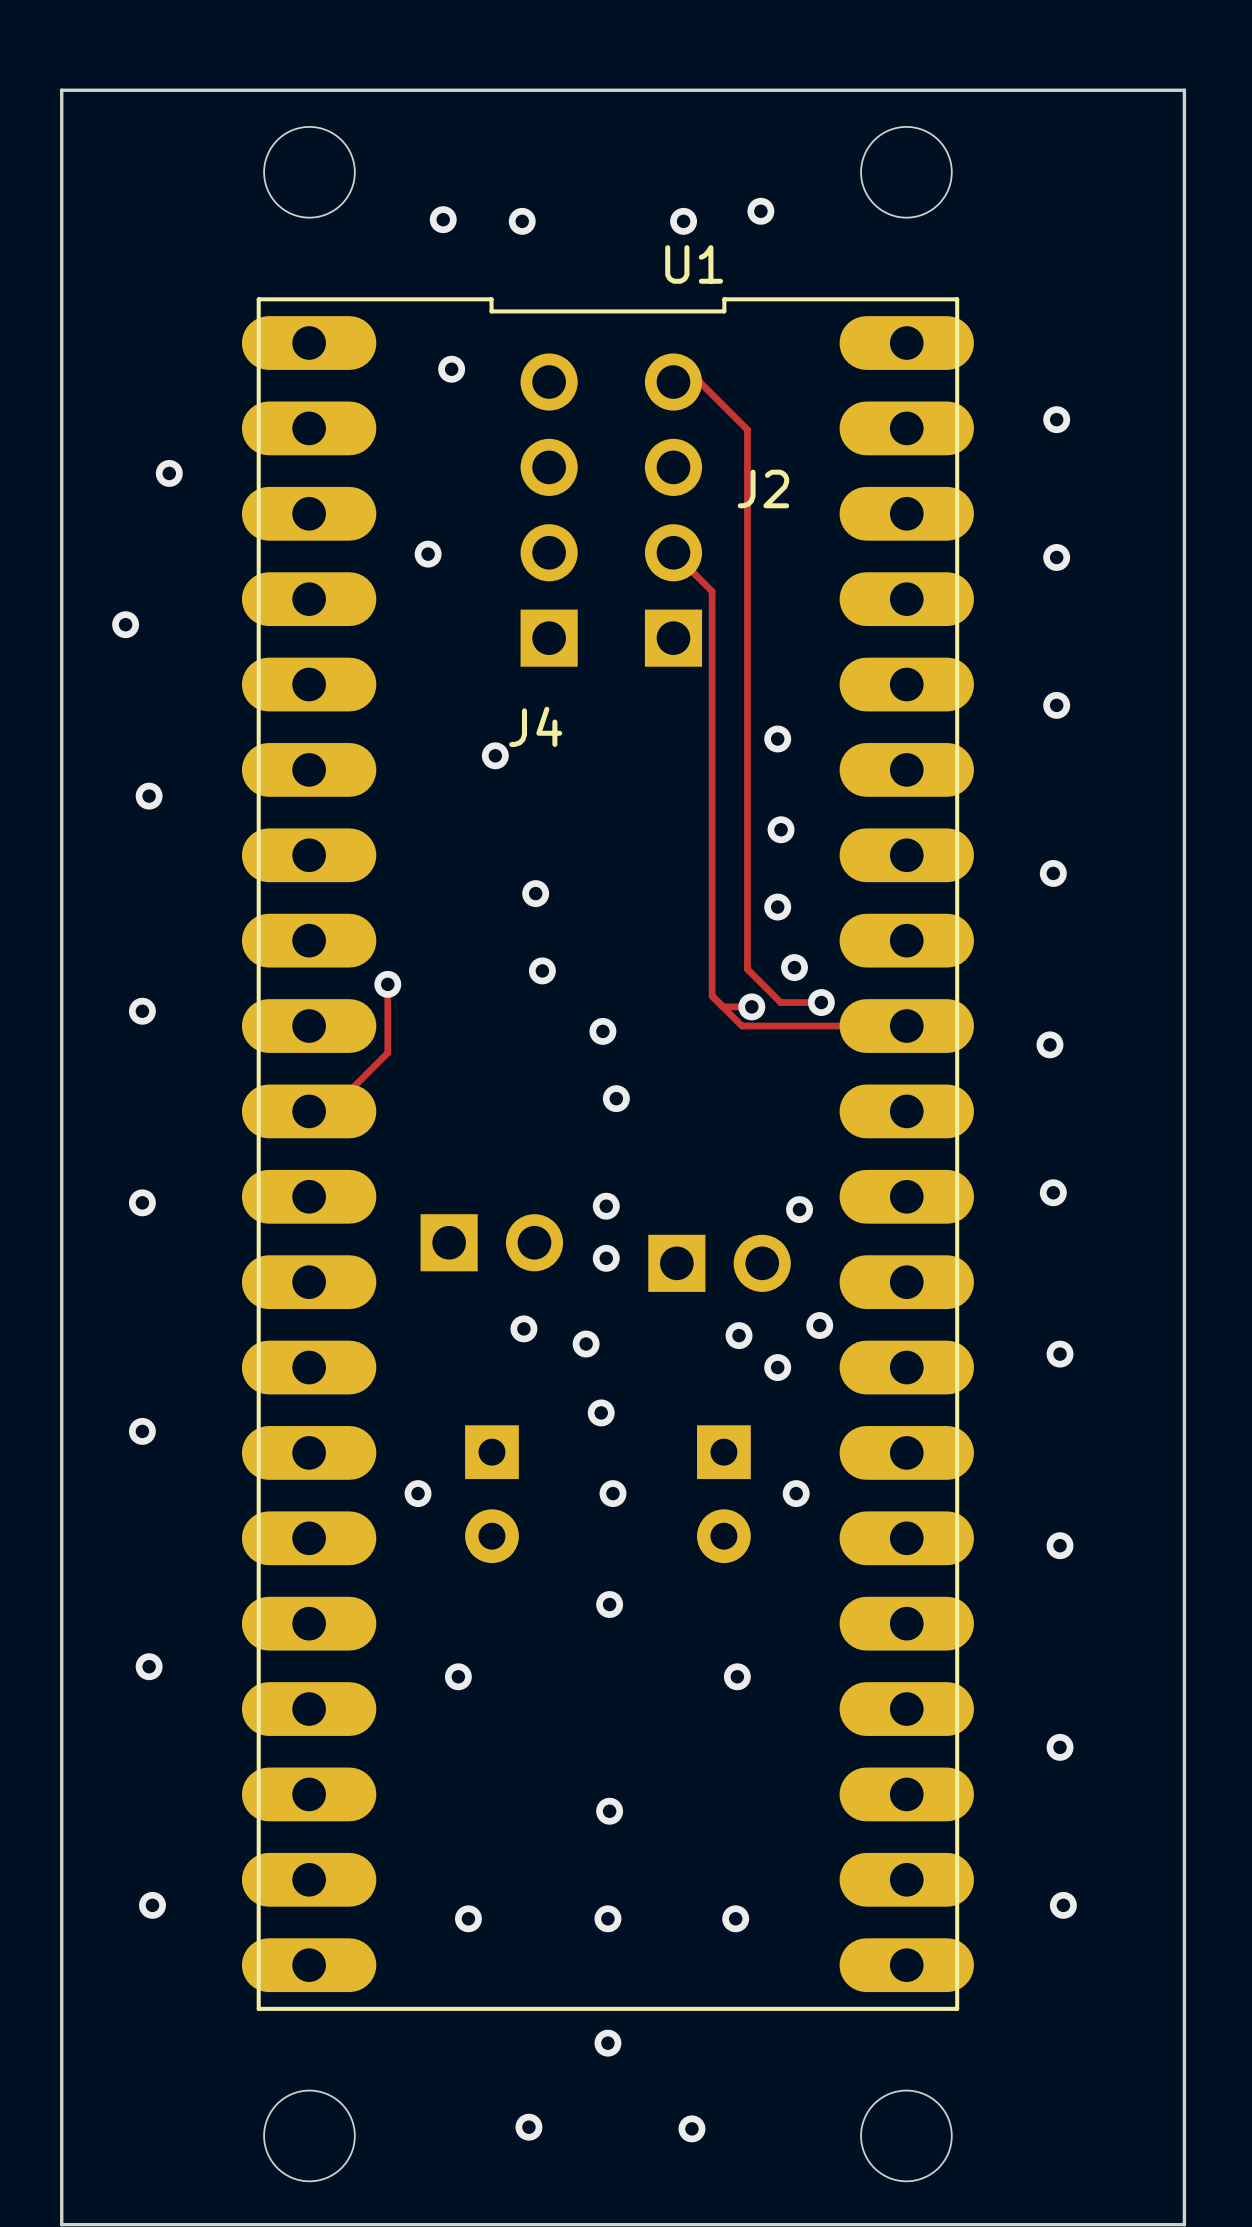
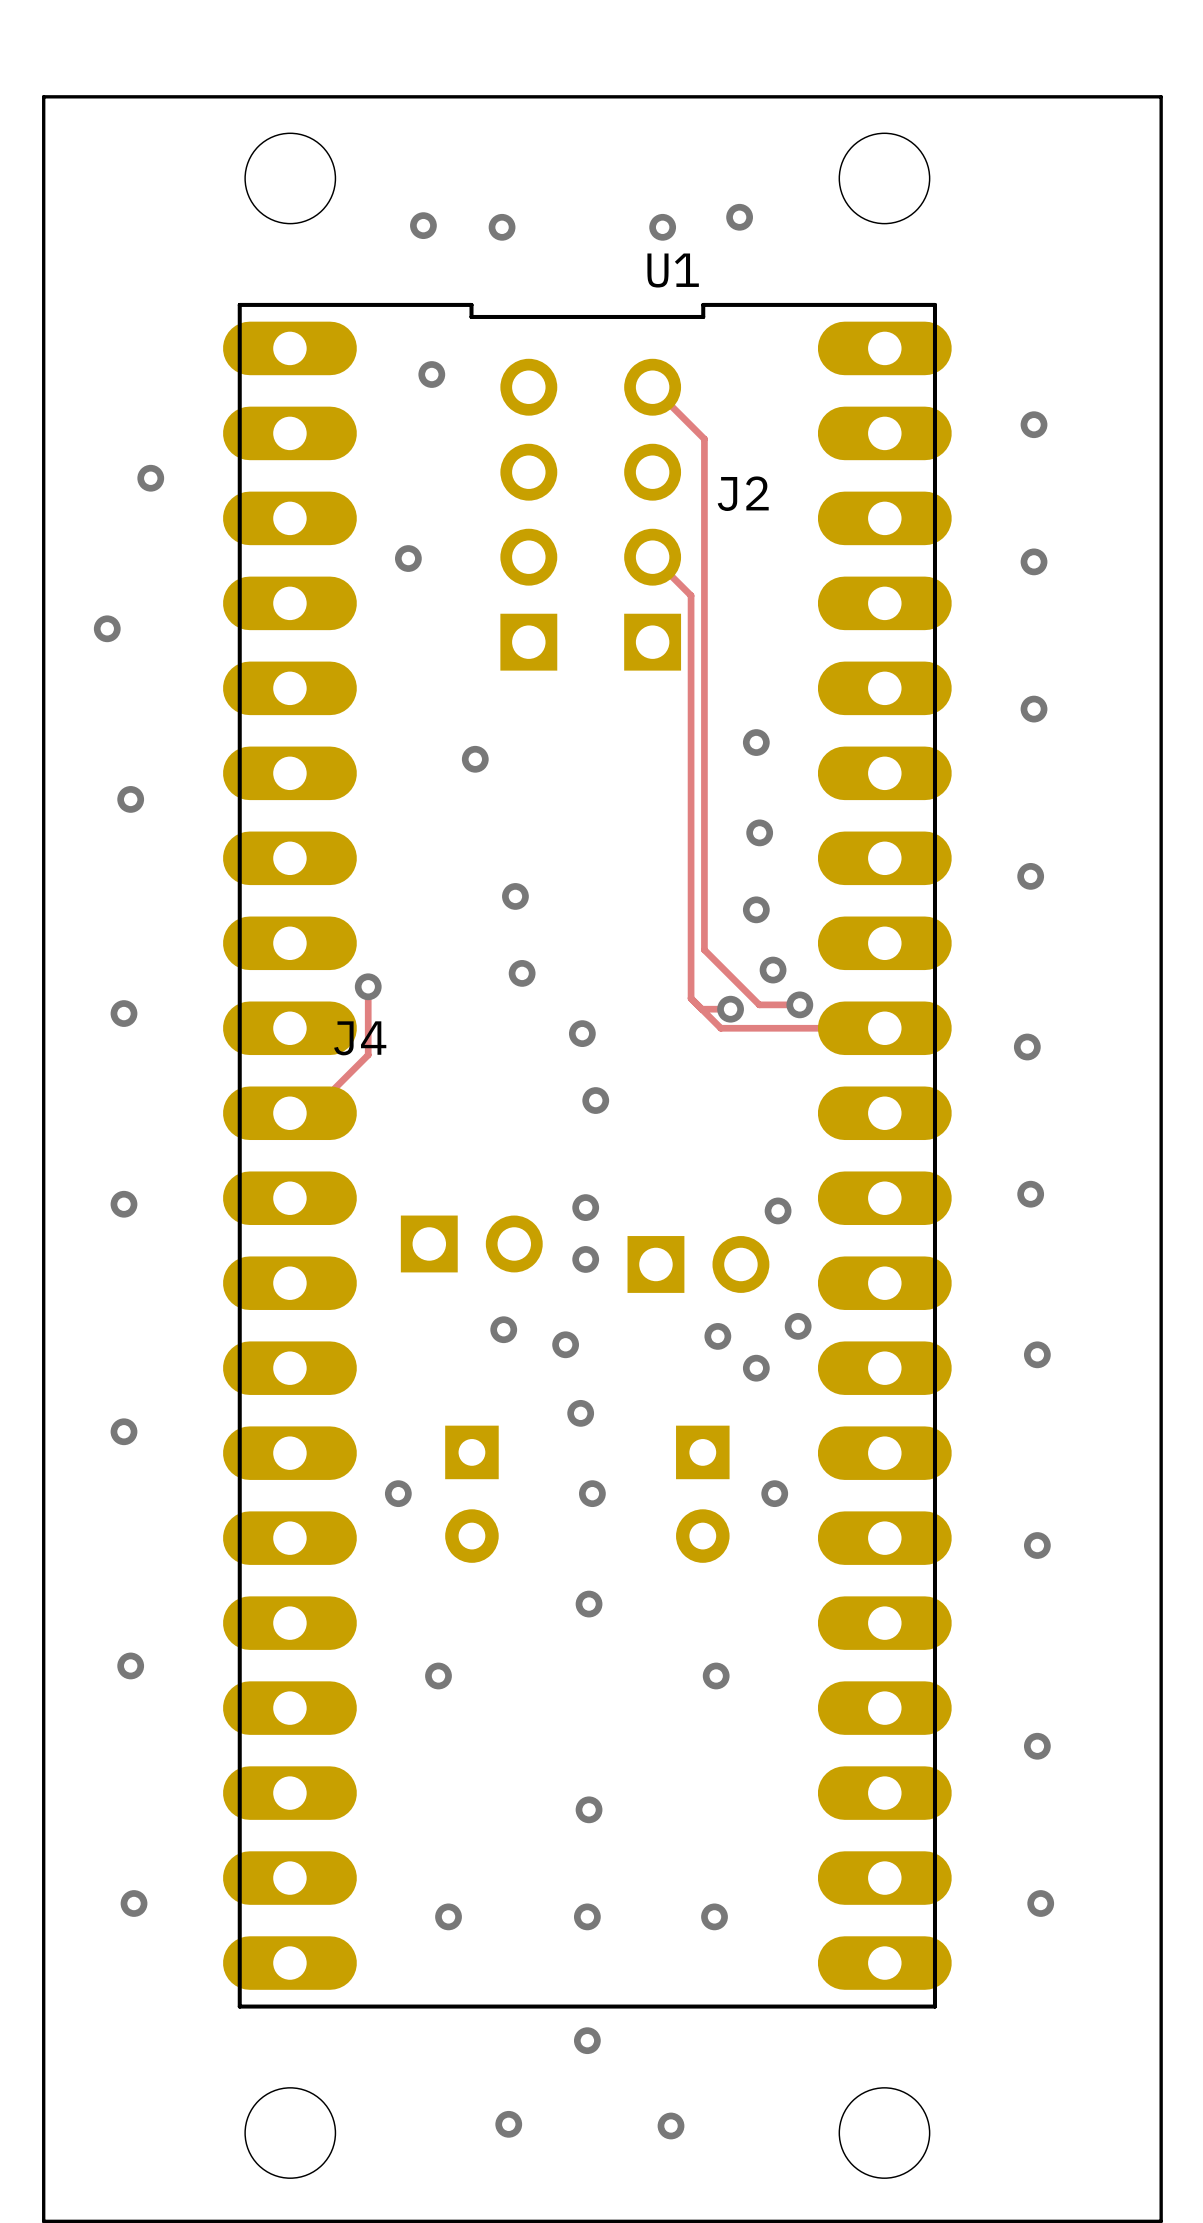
track: (673, 382) (699, 382) (747, 429) (747, 969) -> (652, 387) (704, 439) (704, 949) (726, 971)
J4 name position: J4 (535, 726) -> J4 (360, 1038)

